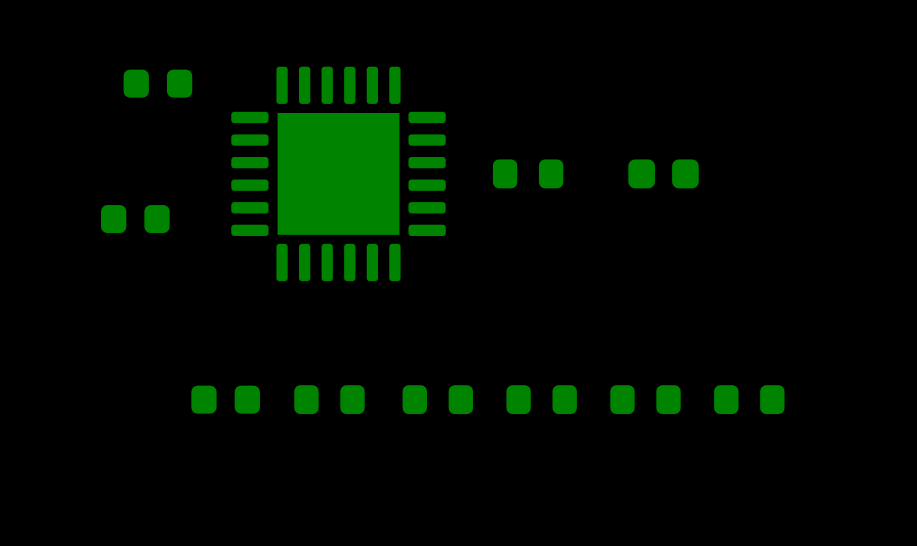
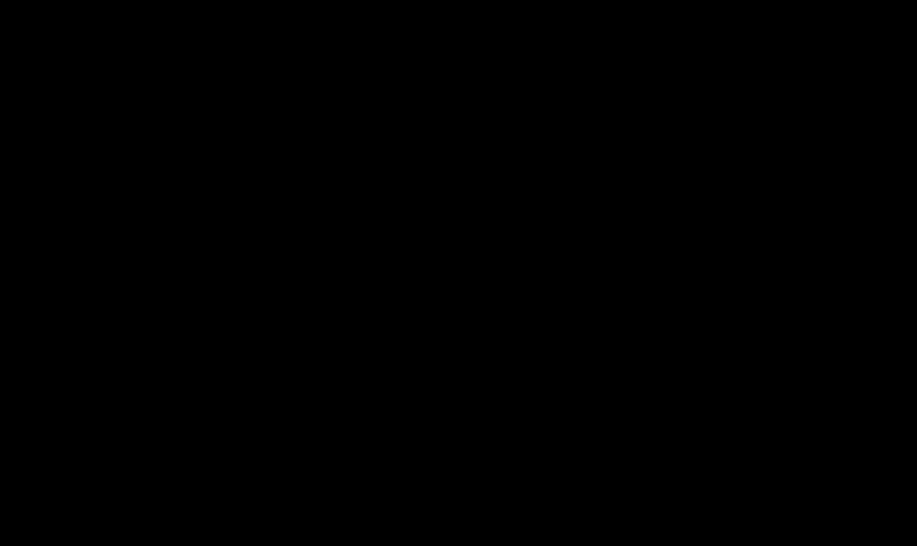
part: (157, 83) -> none
part: (338, 173) -> none
part: (528, 173) -> none
part: (663, 173) -> none
part: (135, 219) -> none
part: (225, 399) -> none
part: (329, 399) -> none
part: (437, 399) -> none
part: (541, 399) -> none
part: (645, 399) -> none
part: (749, 399) -> none

